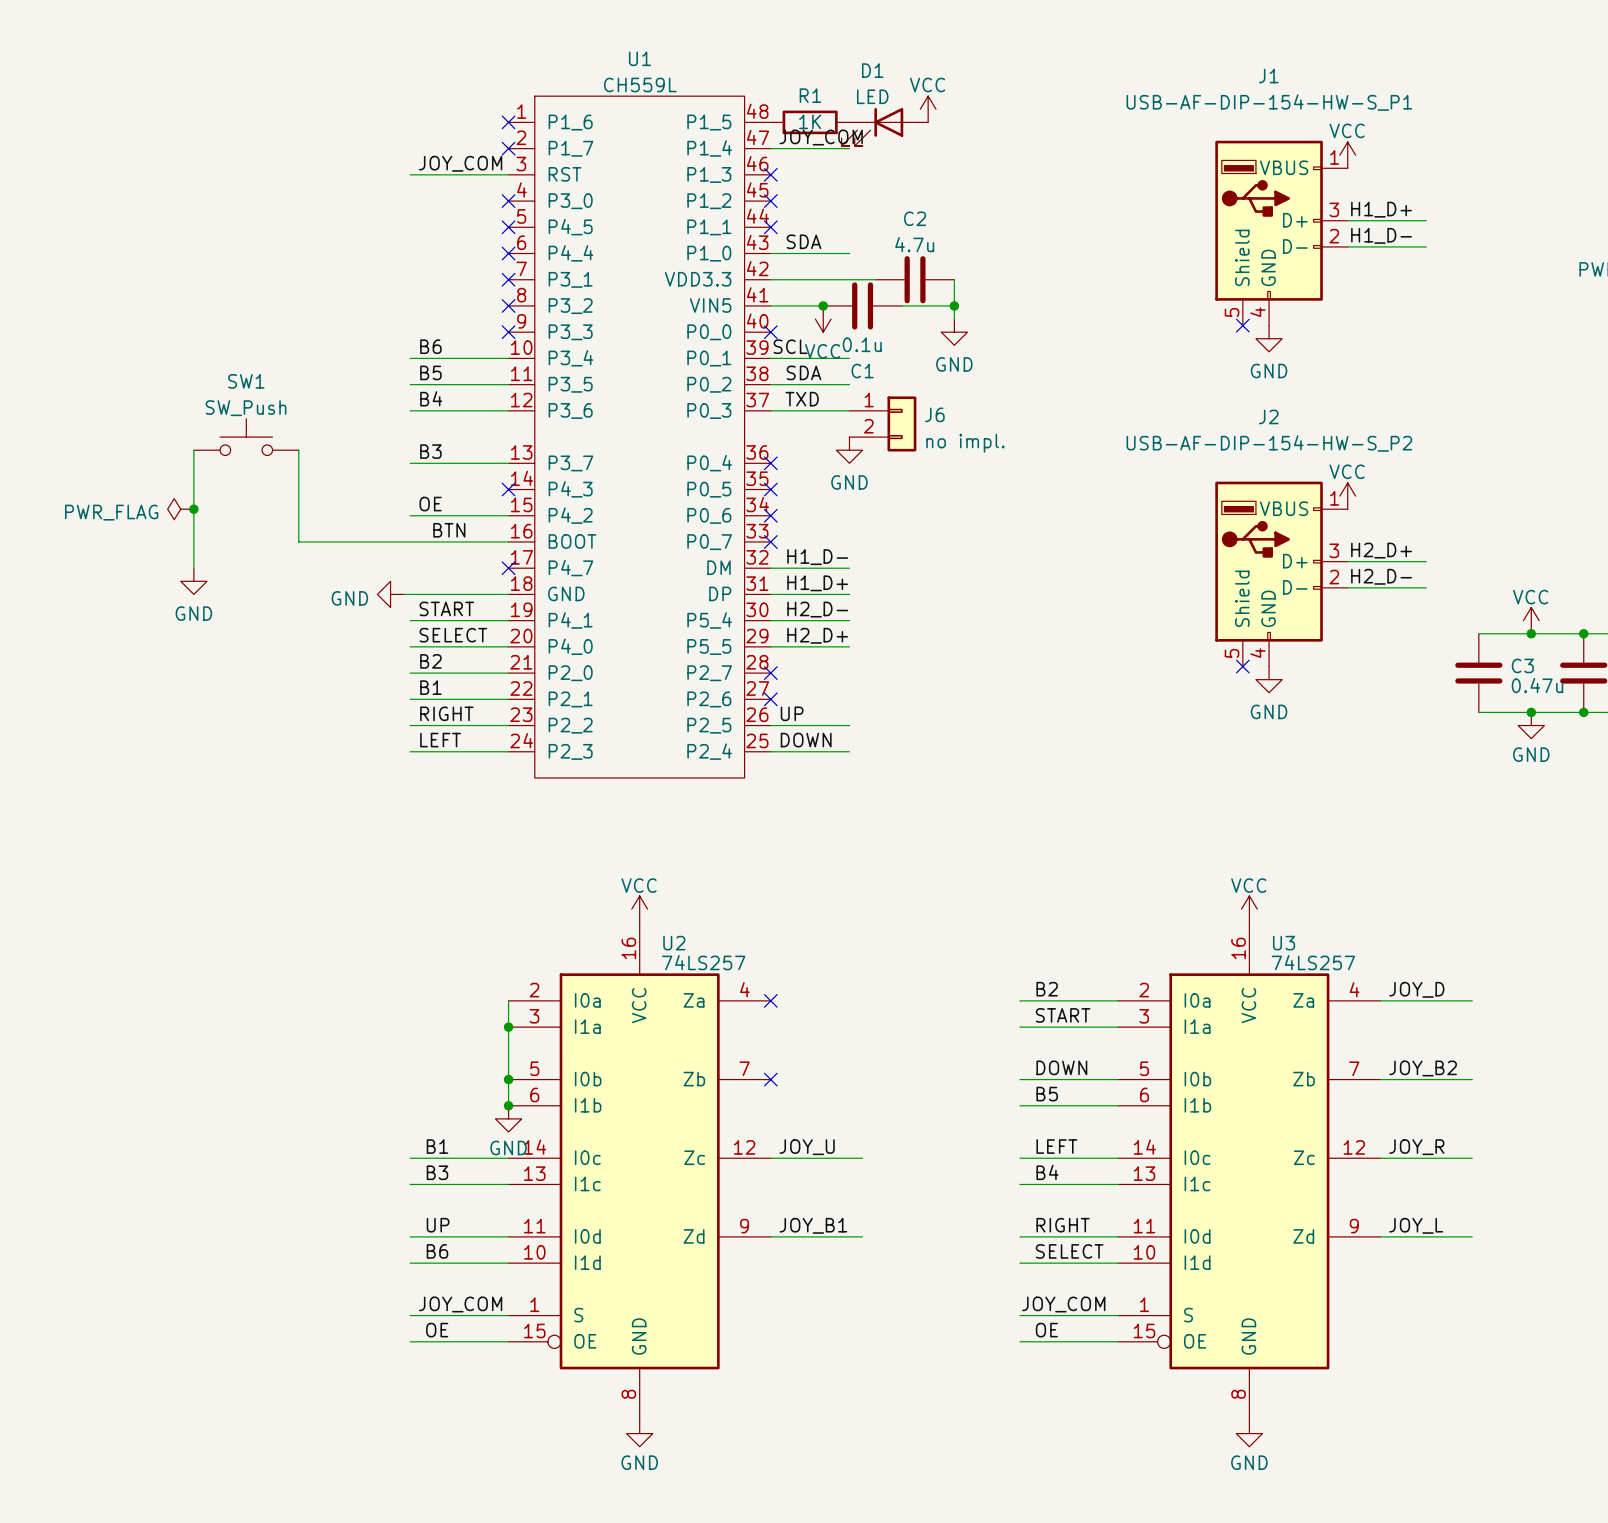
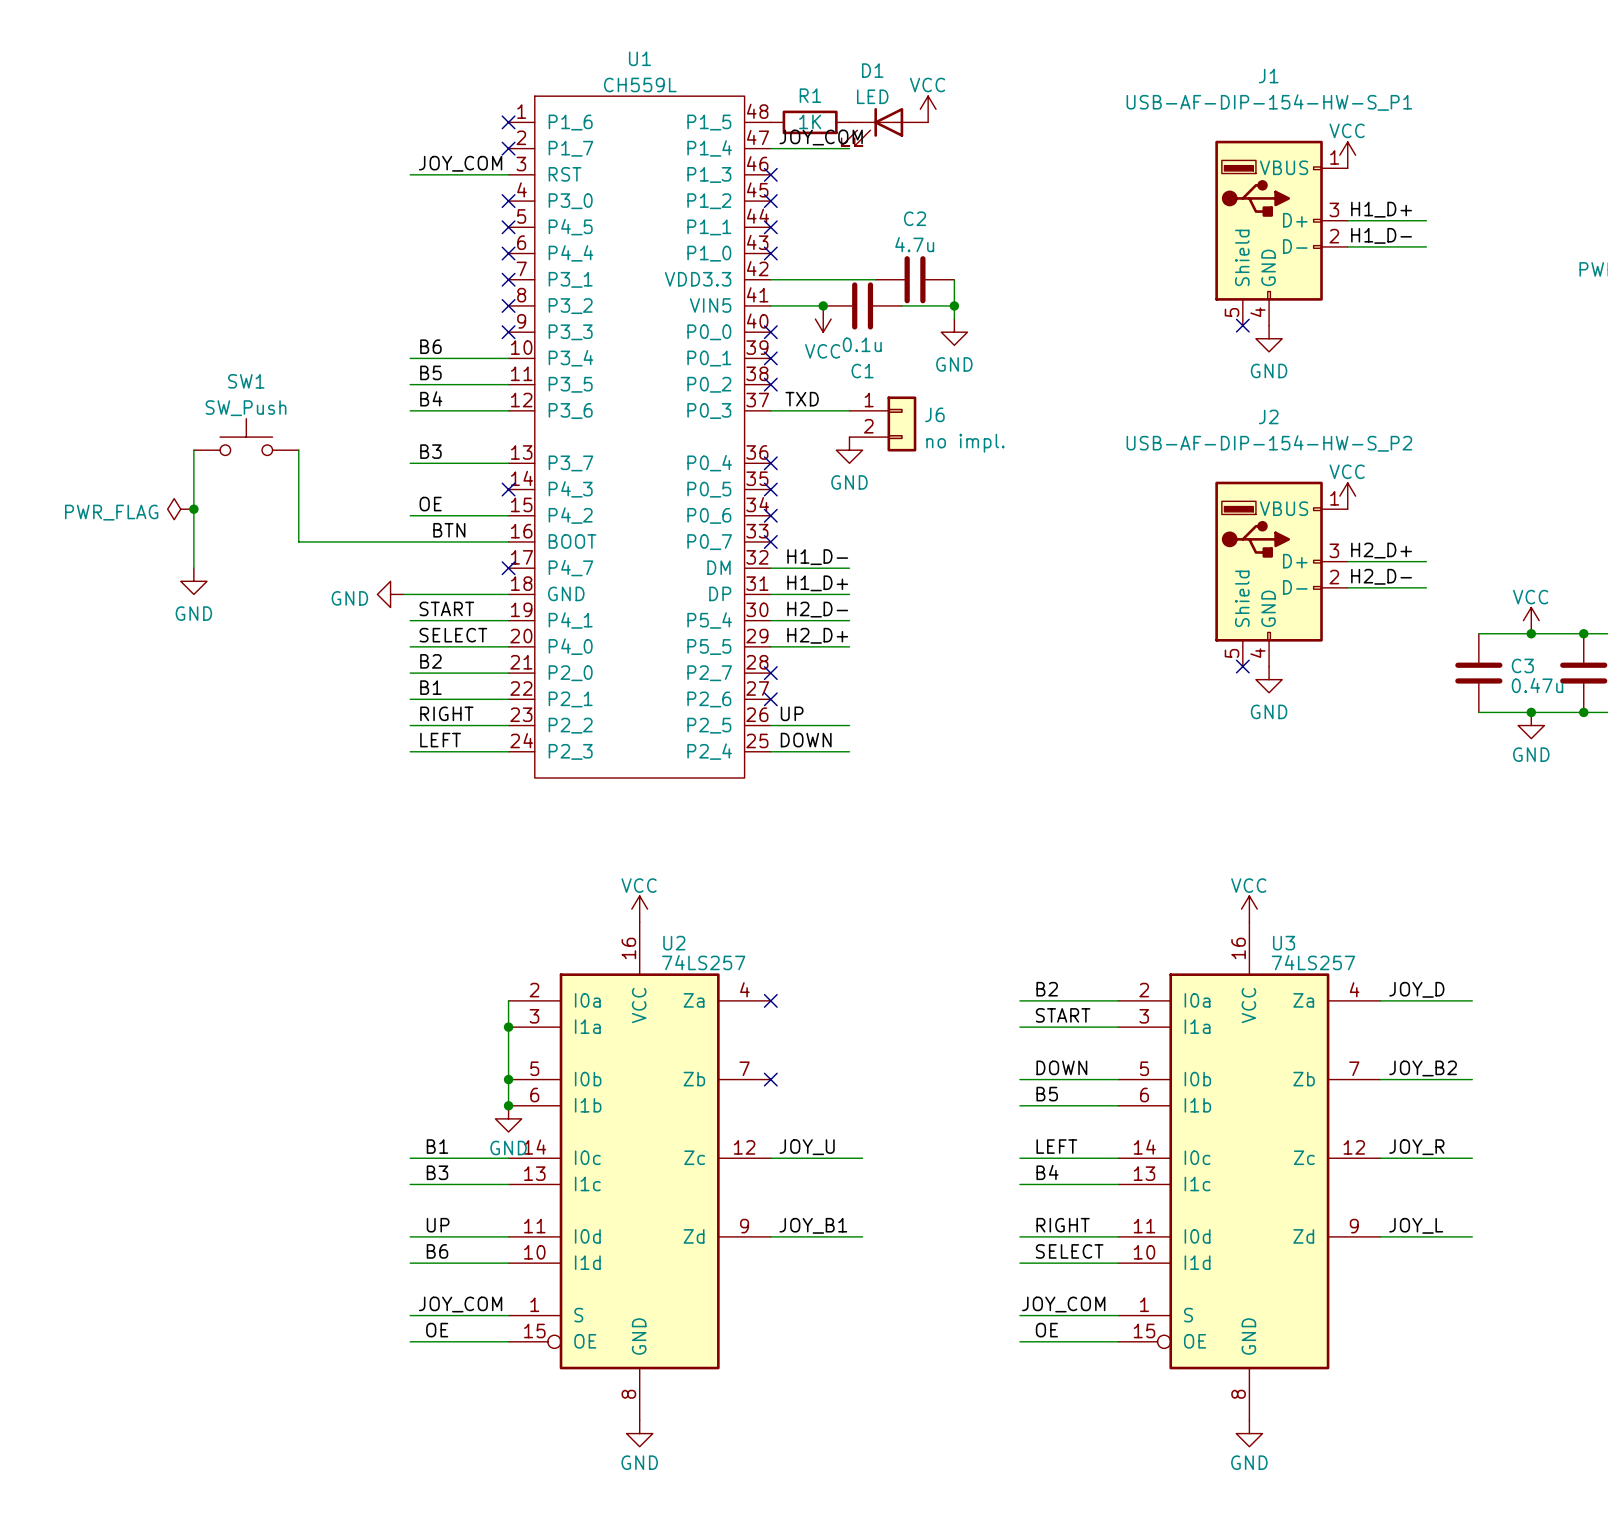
label: SDA (803, 241) -> none
wire: (770, 253) (849, 253) -> none
no-connect mark: none -> (770, 253)
label: SCL (790, 346) -> none
wire: (770, 358) (849, 358) -> none
no-connect mark: none -> (770, 358)
label: SDA (803, 372) -> none
wire: (770, 384) (849, 384) -> none
no-connect mark: none -> (770, 384)

